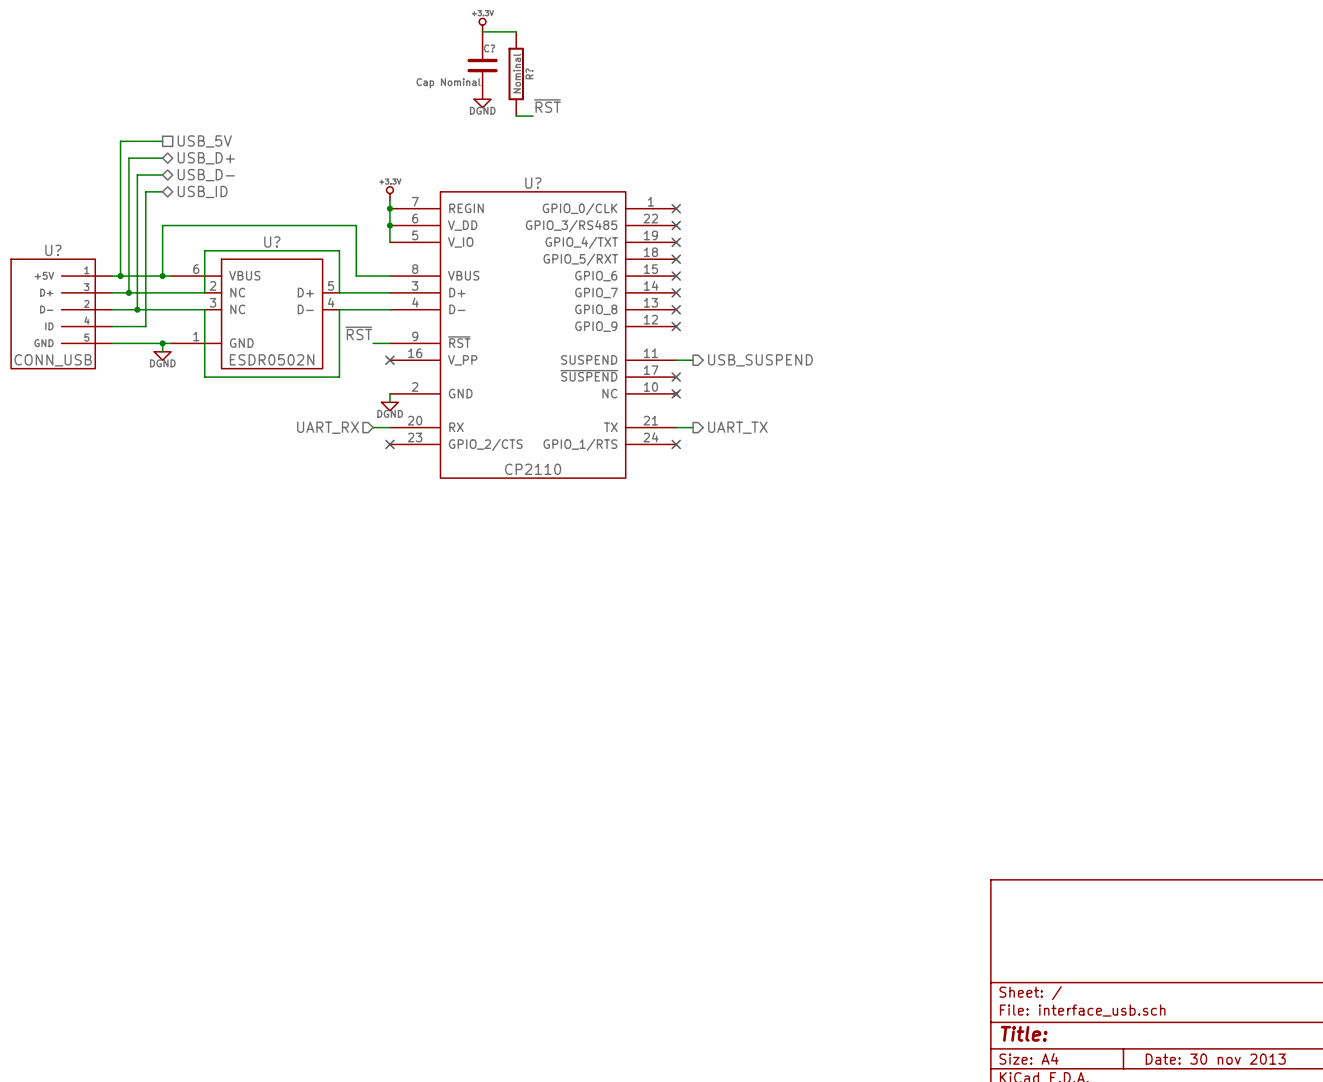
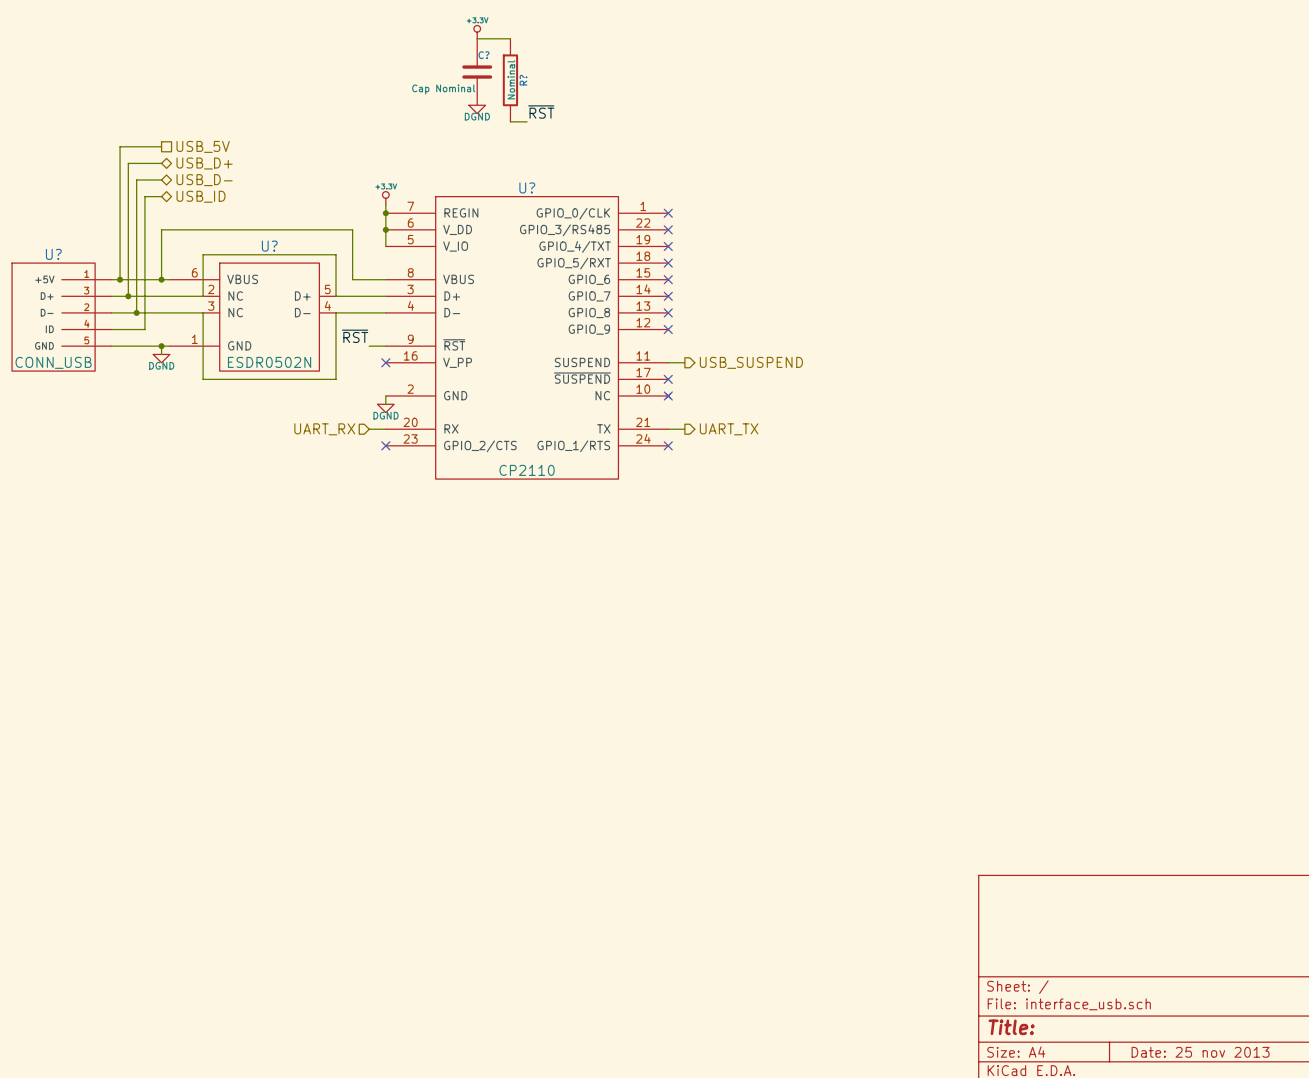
title block: Date: 30 nov 2013 (1215, 1059) -> Date: 25 nov 2013 (1200, 1052)

